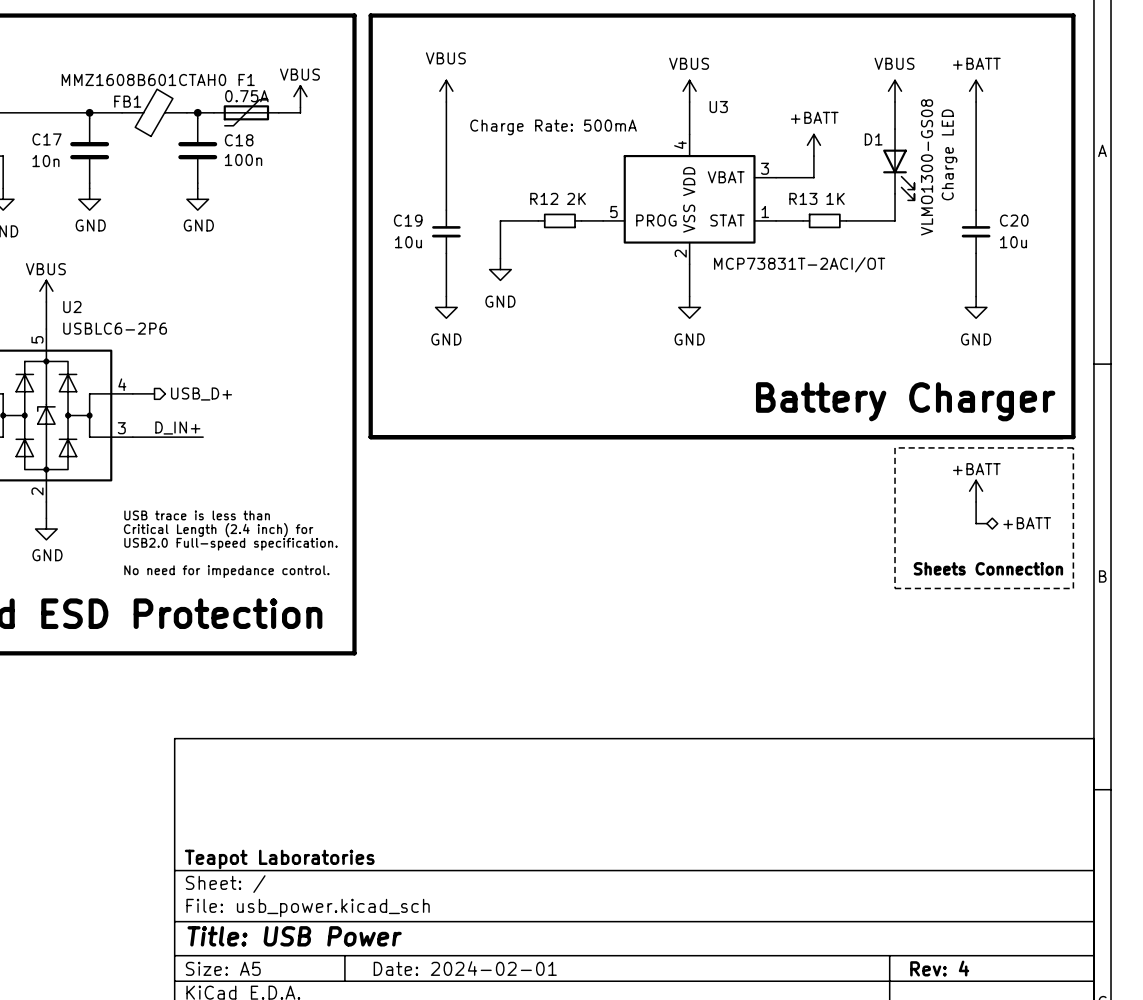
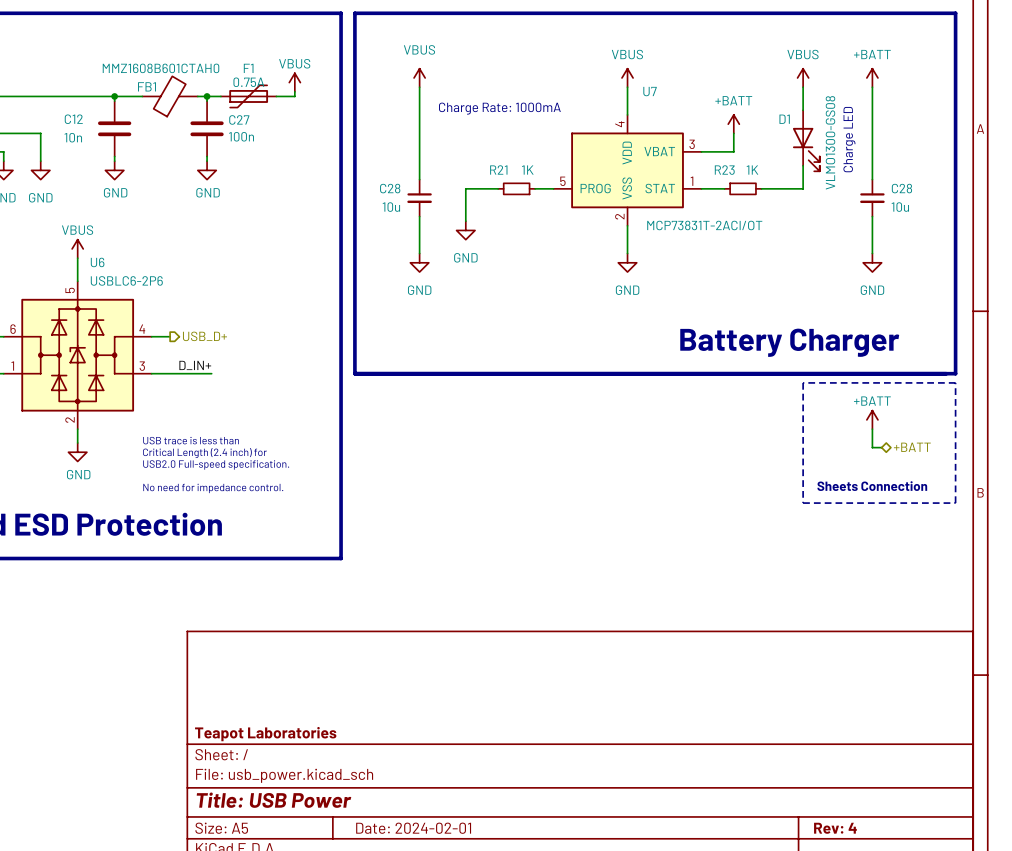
U3 name: U3 (718, 107) -> U7 (650, 91)
text: Charge Rate: 500mA (553, 127) -> Charge Rate: 1000mA (499, 108)
C17 name: C17 (46, 139) -> C12 (73, 119)
C18 name: C18 (239, 140) -> C27 (239, 119)
R12 name: R12 (544, 198) -> R21 (498, 169)
R12 value: 2K (576, 198) -> 1K (527, 170)
R13 name: R13 (803, 198) -> R23 (724, 170)
C19 name: C19 (408, 220) -> C28 (390, 188)
C20 name: C20 (1014, 220) -> C28 (901, 188)
U2 name: U2 (72, 307) -> U6 (97, 262)

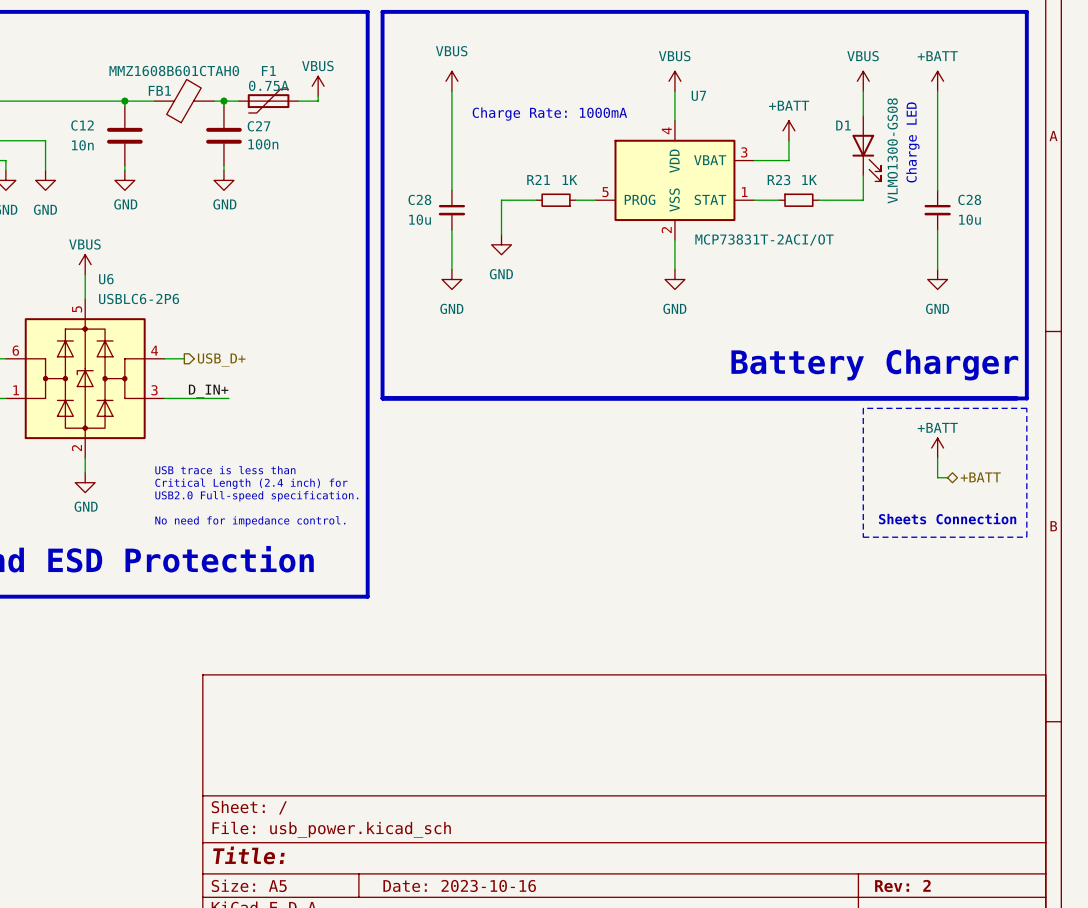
title block: Teapot Laboratories (265, 734) -> none
title block: Title: USB Power (274, 800) -> Title: (248, 855)
title block: Date: 2024-02-01 (413, 828) -> Date: 2023-10-16 (459, 885)
title block: Rev: 4 (835, 828) -> Rev: 2 (902, 885)

